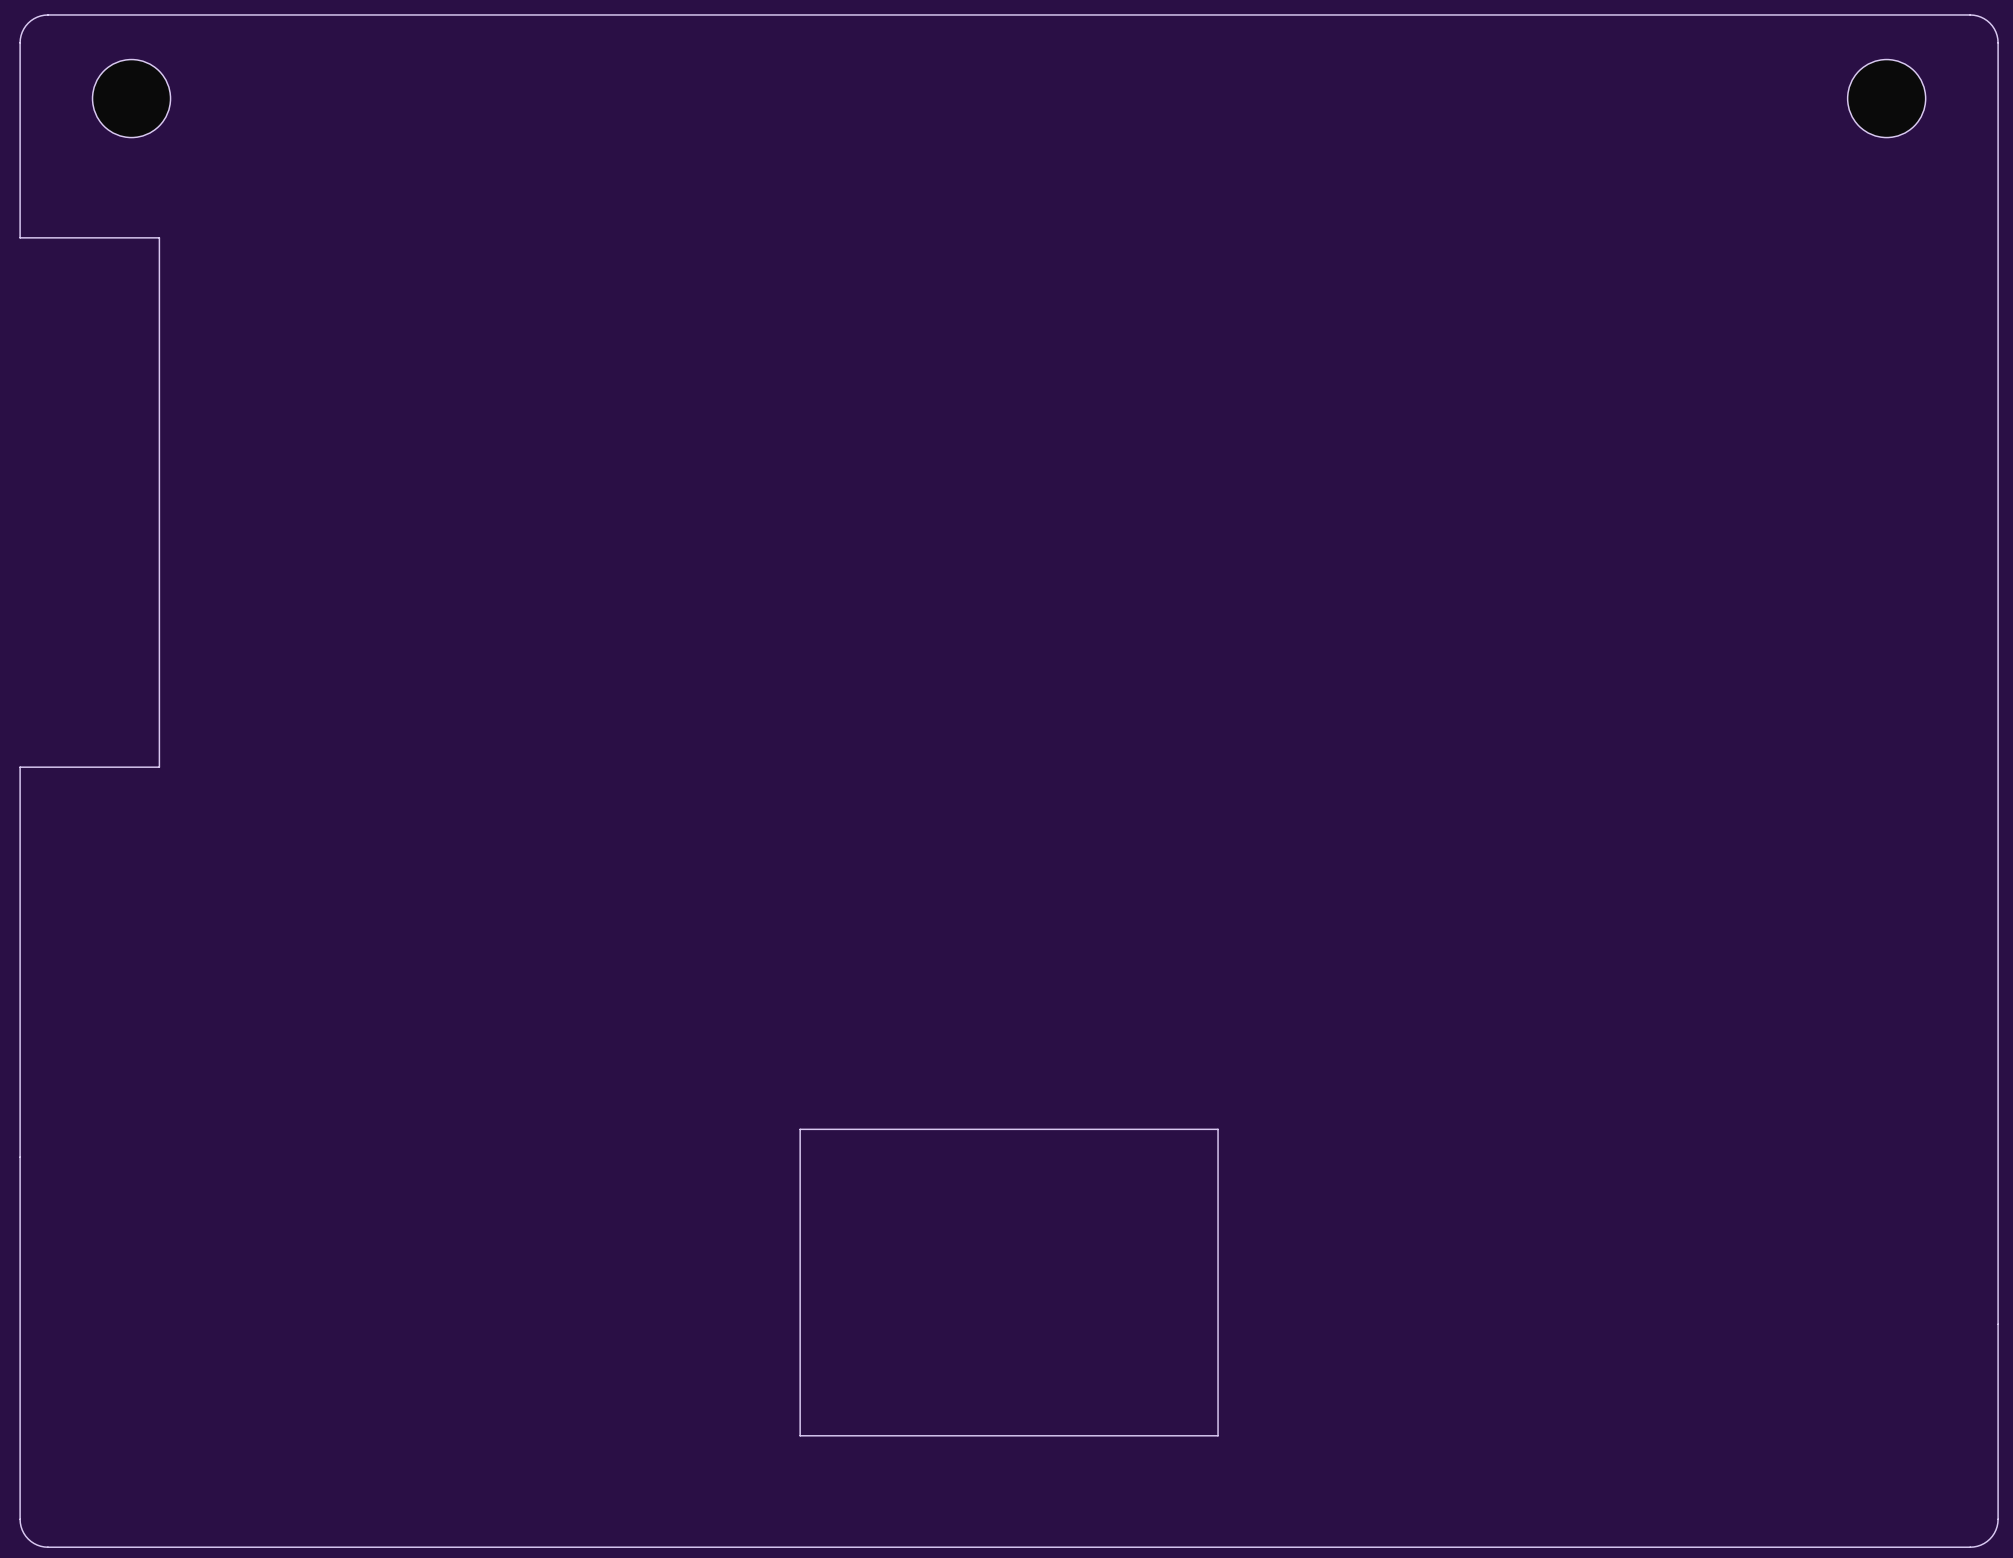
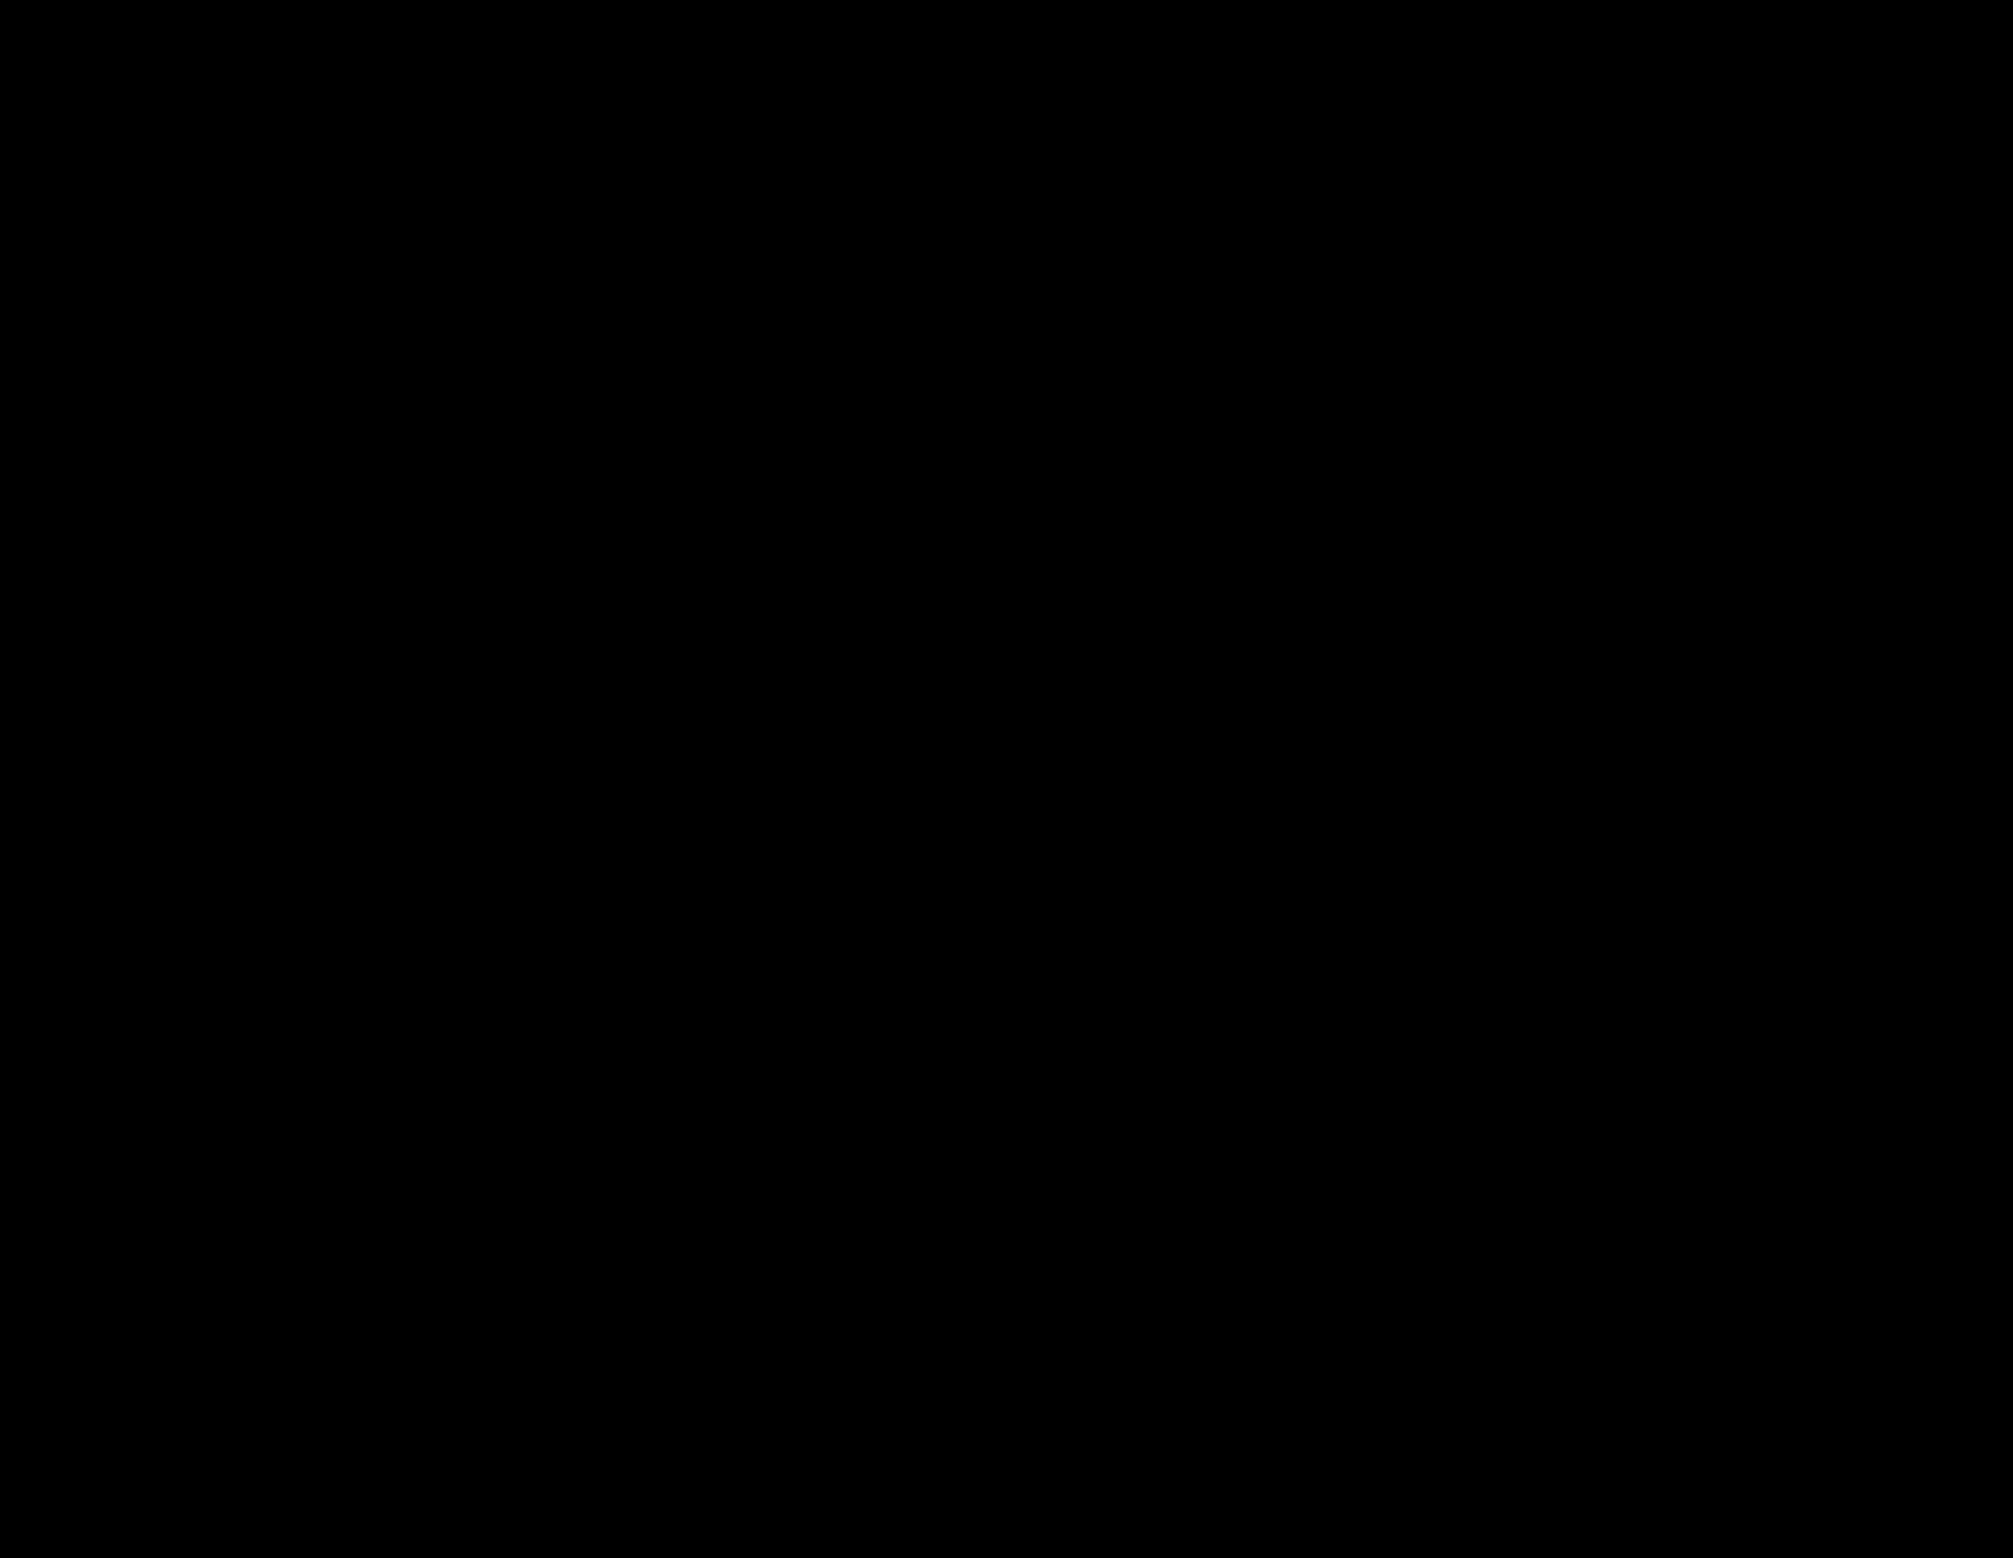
board edge: (1970, 14) (47, 14) (30, 20) (22, 32) (20, 42) (20, 237) (159, 237) (159, 767) (20, 767) (20, 1519) (25, 1536) (37, 1545) (47, 1547) (1970, 1547) (1987, 1541) (1995, 1530) (1998, 1519) (1998, 42) (1995, 32) (1989, 23) (1980, 17) (1970, 14) -> none
part: (131, 98) -> none
part: (1886, 98) -> none
board edge: (1218, 1129) (800, 1129) (800, 1435) (1218, 1435) (1218, 1129) -> none

